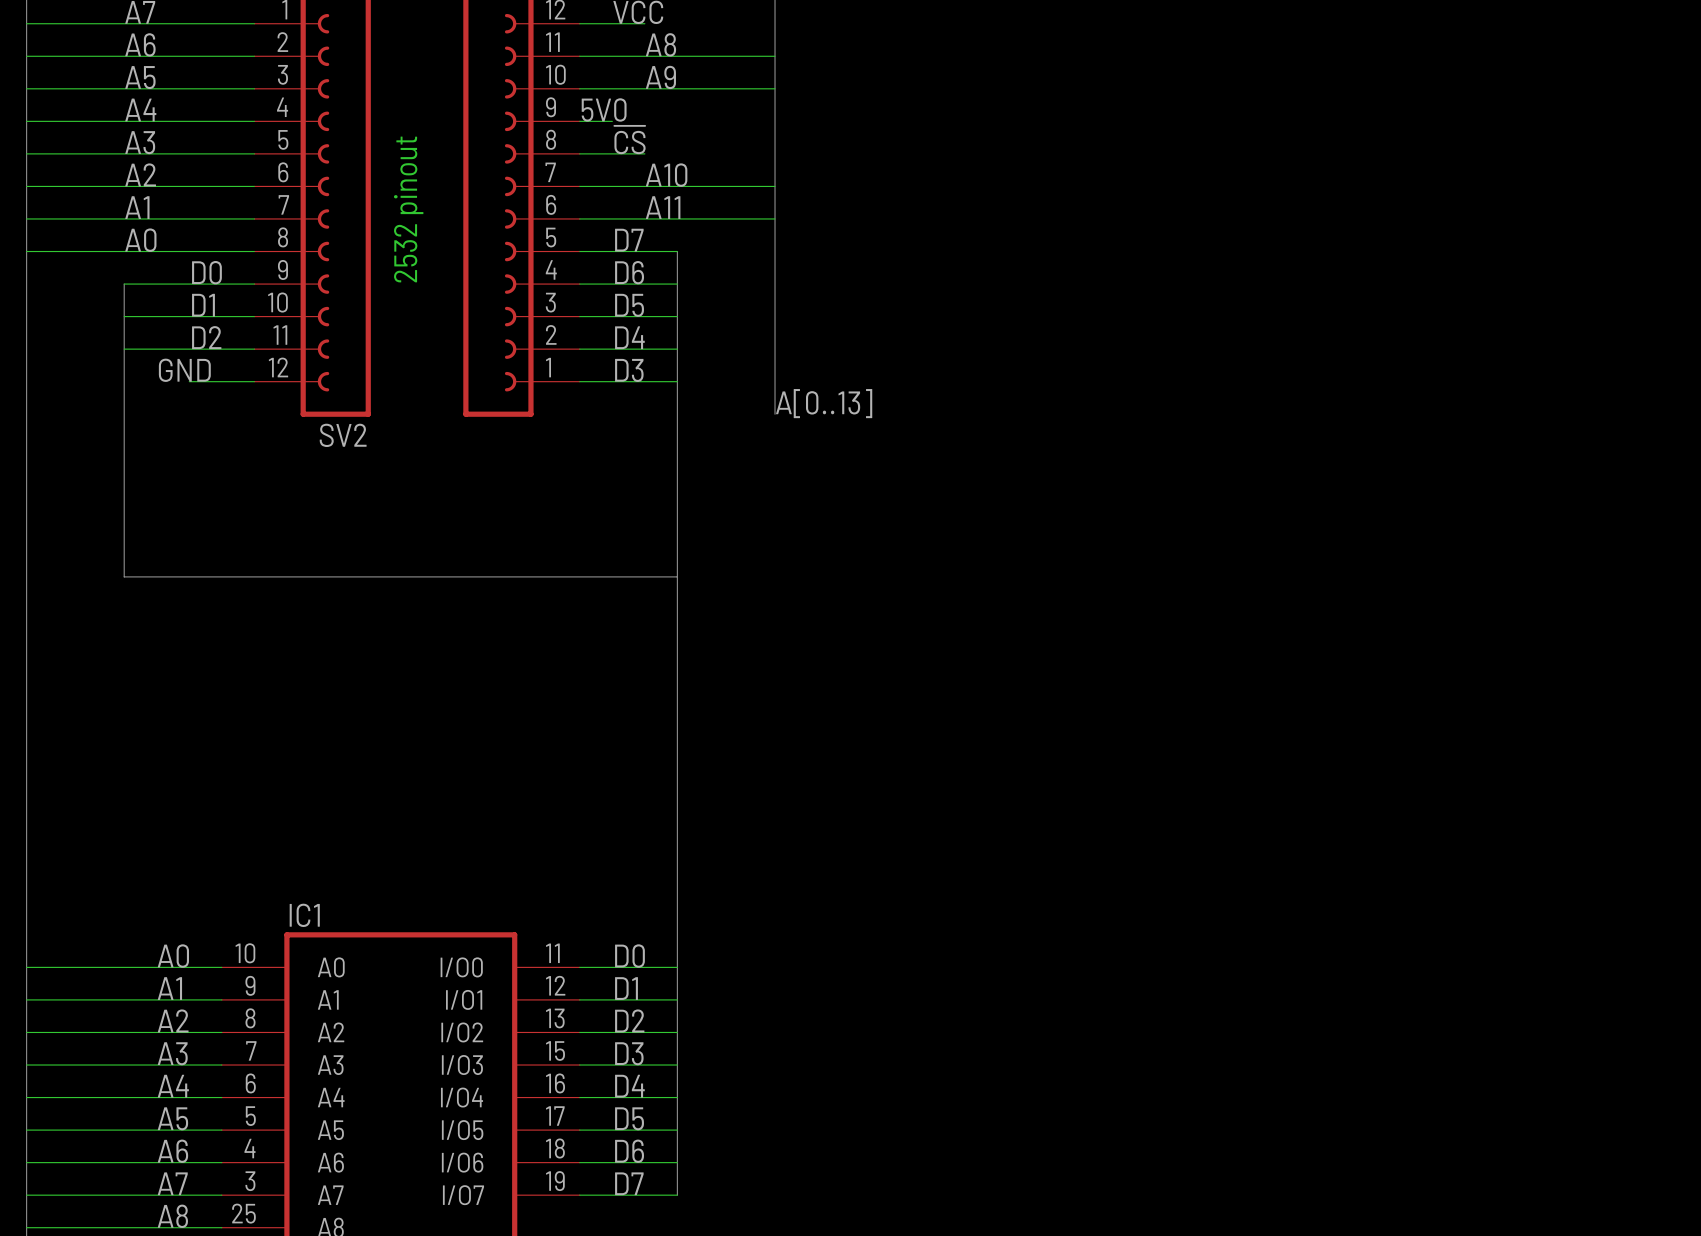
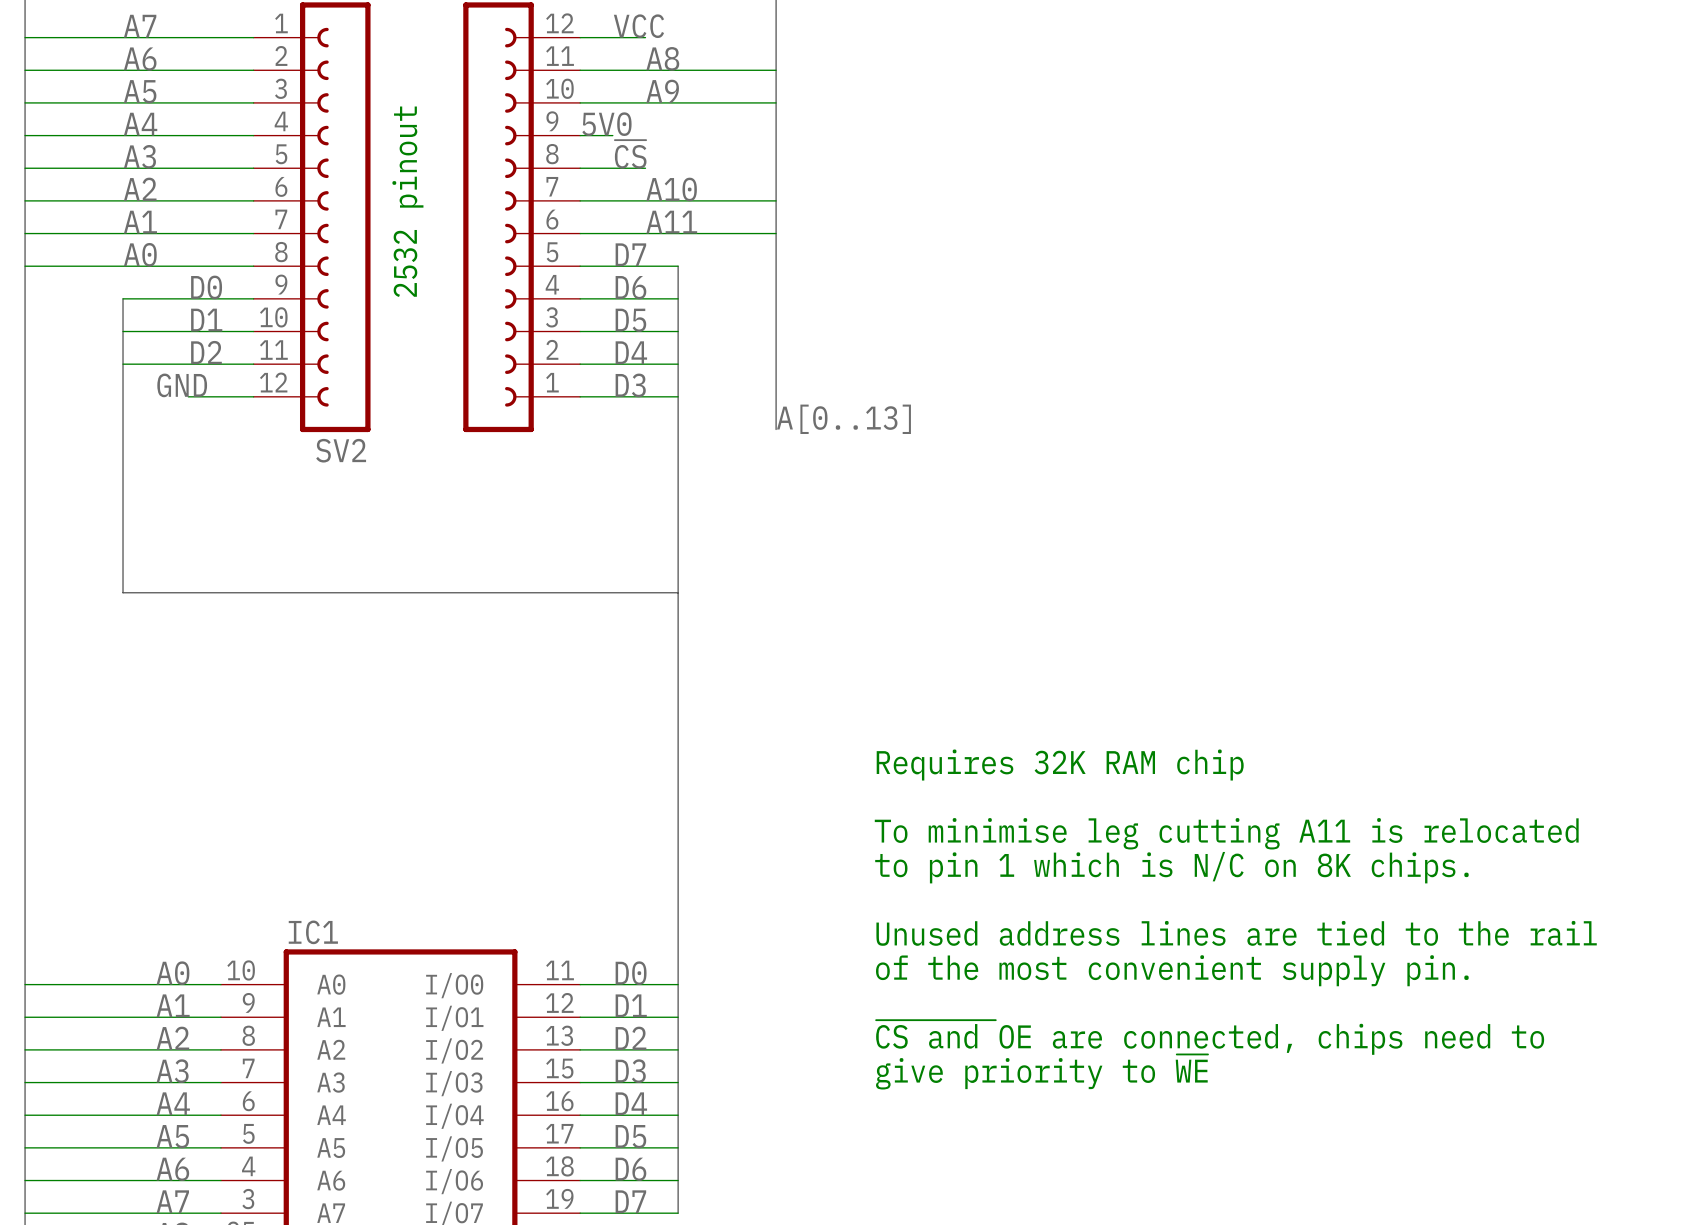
text: none -> Requires 32K RAM chip (1060, 765)
text: none -> To minimise leg cutting A11 is relocated (1226, 833)
text: none -> to pin 1 which is N/C on 8K chips. (1171, 867)
text: none -> Unused address lines are tied to the rail (1236, 933)
text: none -> of the most convenient supply pin. (1172, 970)
text: none -> ~{CS and }OE are connected, chips need to (1210, 1037)
text: none -> give priority to ~{WE} (1042, 1071)

